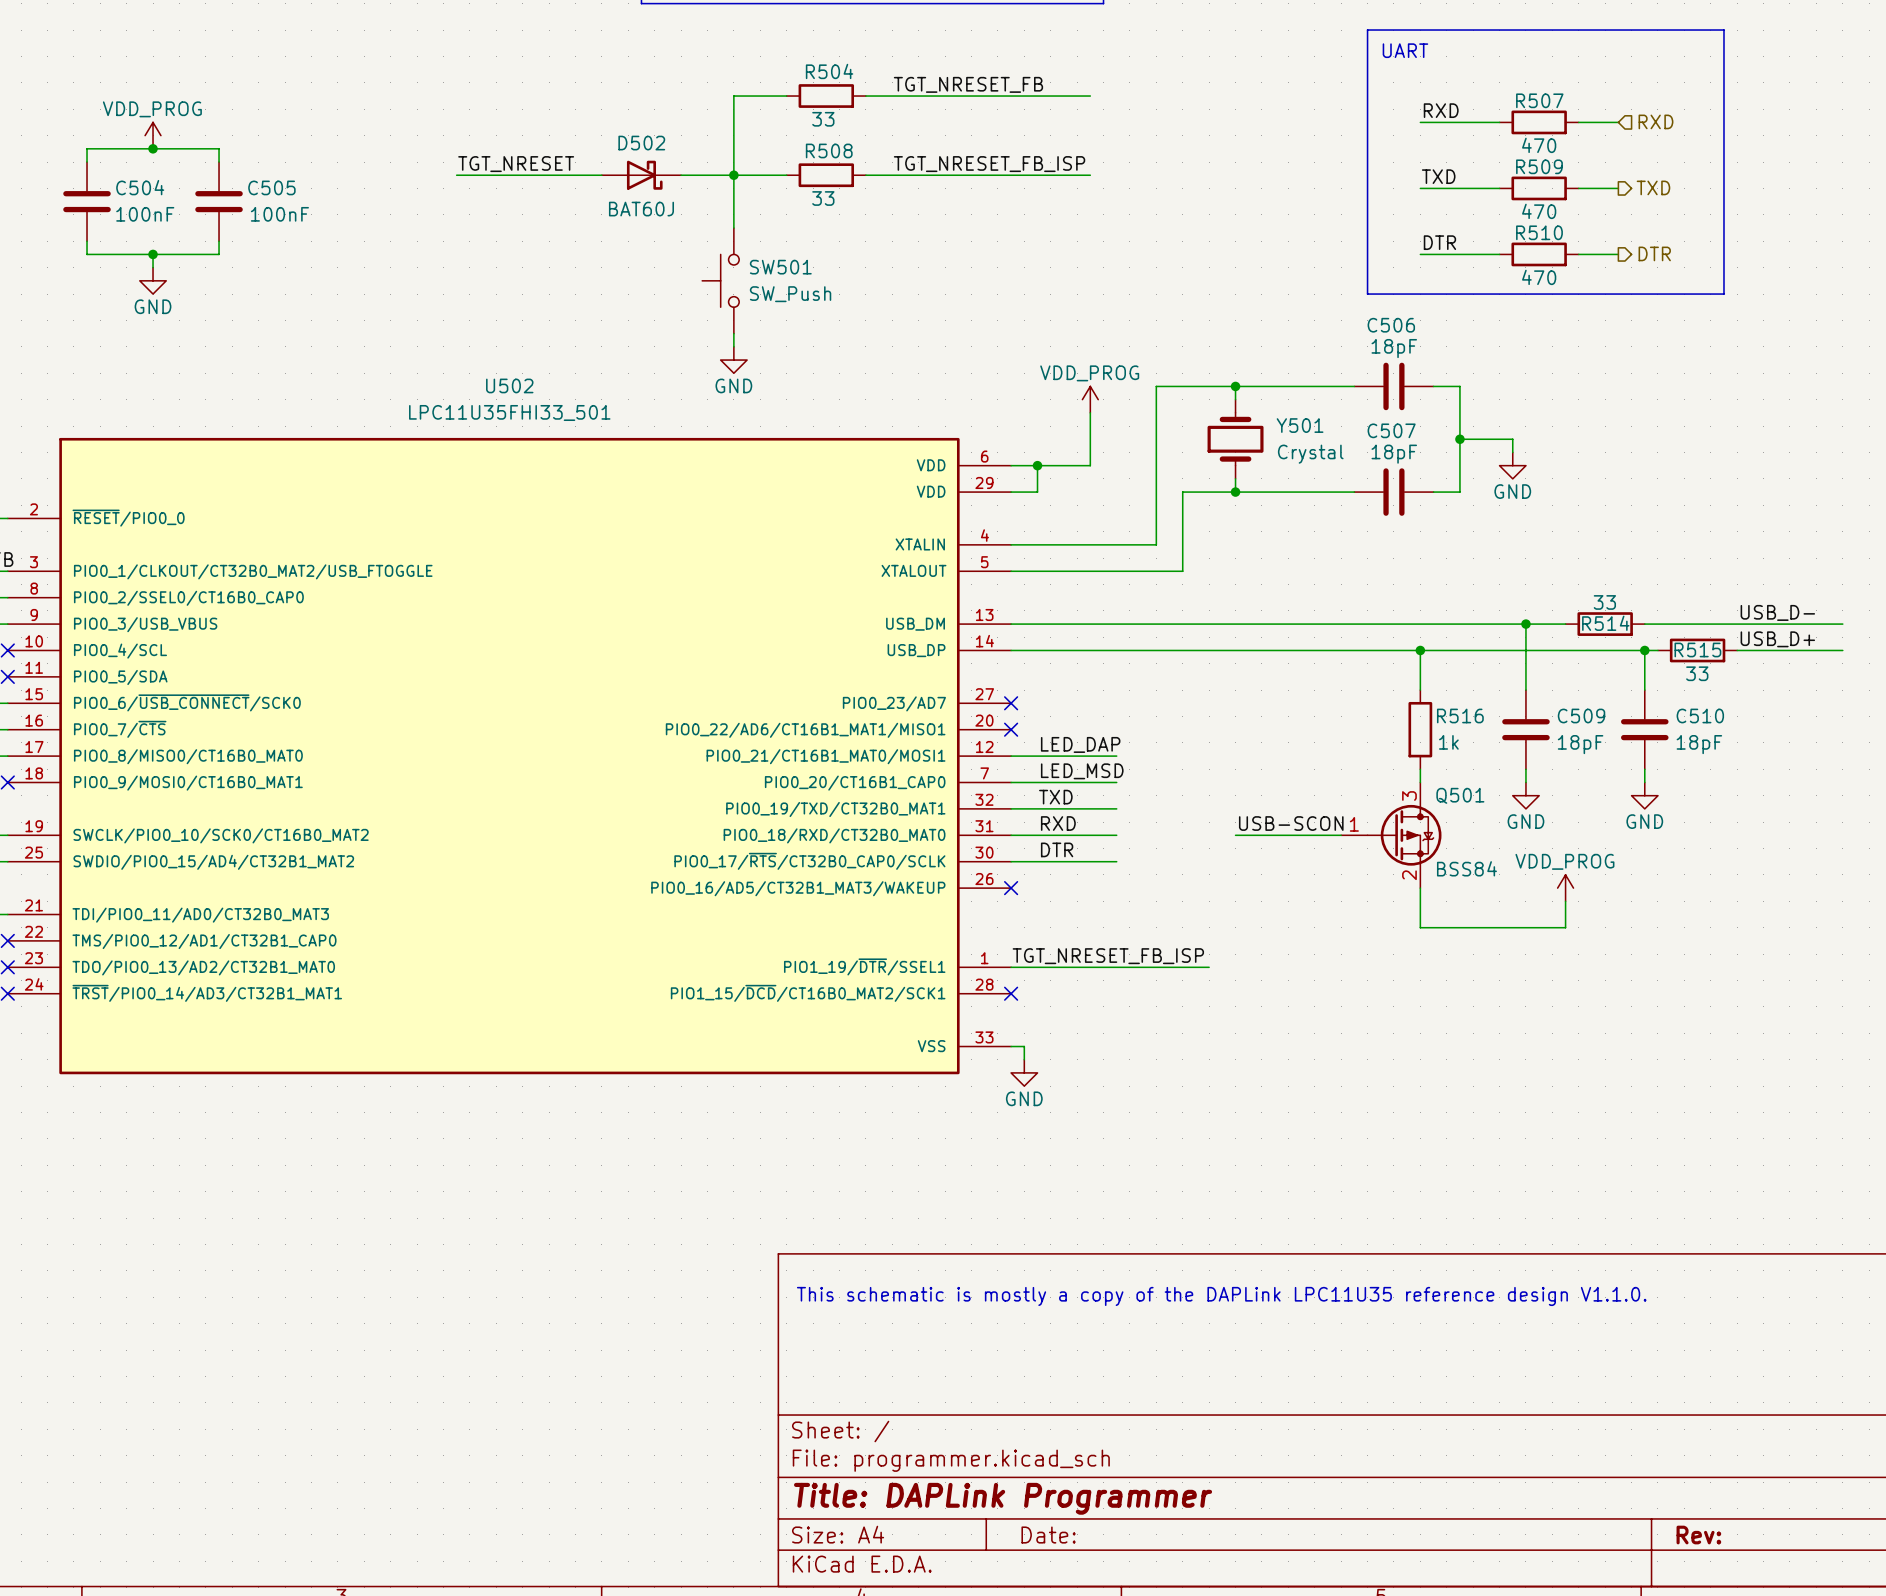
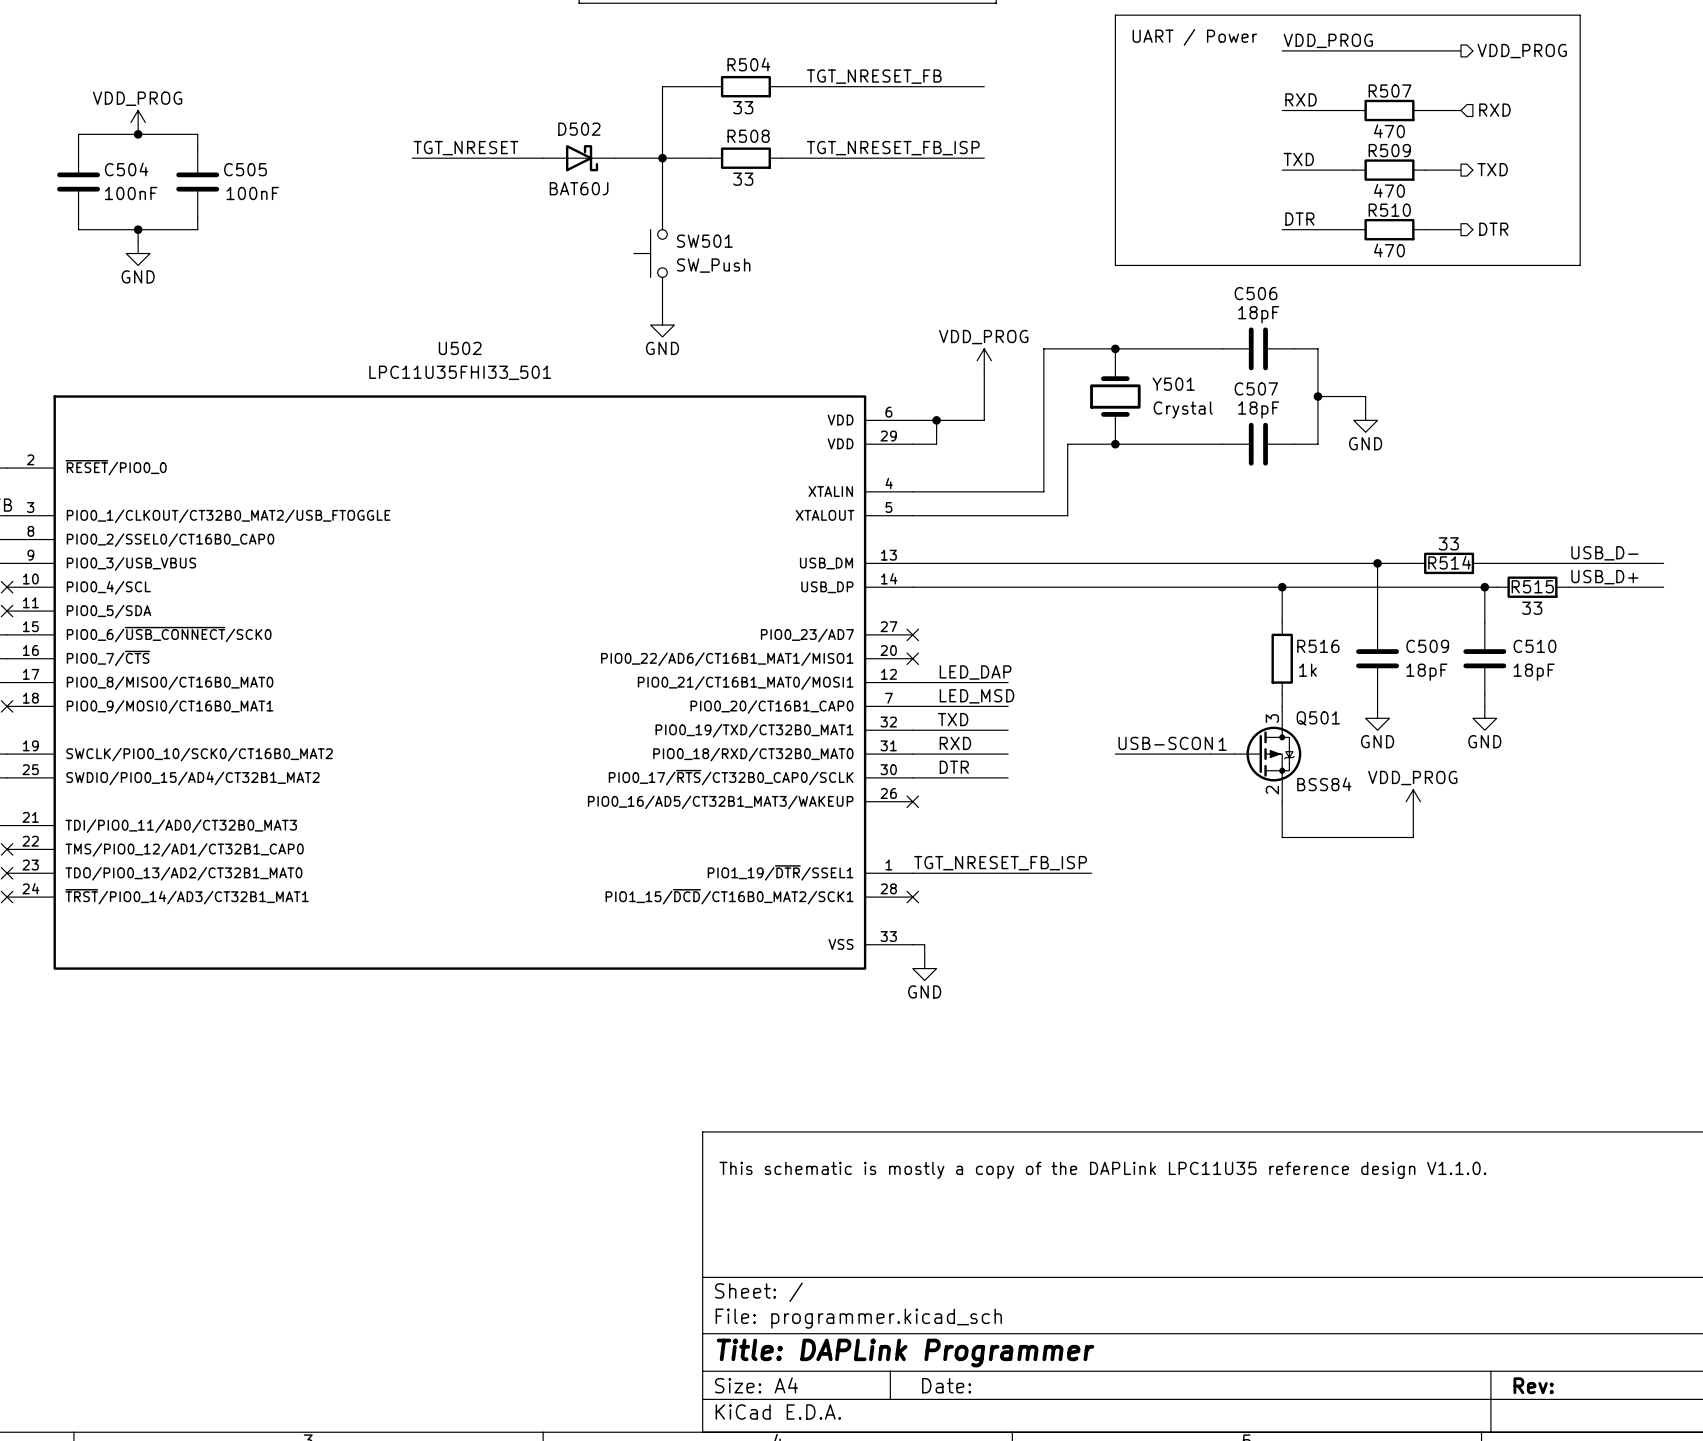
text: none -> UART / Power (1194, 37)
label: none -> VDD_PROG (1328, 40)
text: UART (1405, 50) -> none
wire: none -> (1282, 50) (1460, 50)
hierarchical label: none -> VDD_PROG (1522, 51)
line: (1367, 294) (1367, 30) (1723, 30) (1723, 294) -> (1234, 265) (1115, 265) (1115, 15) (1580, 15) (1580, 265) (1556, 265)

